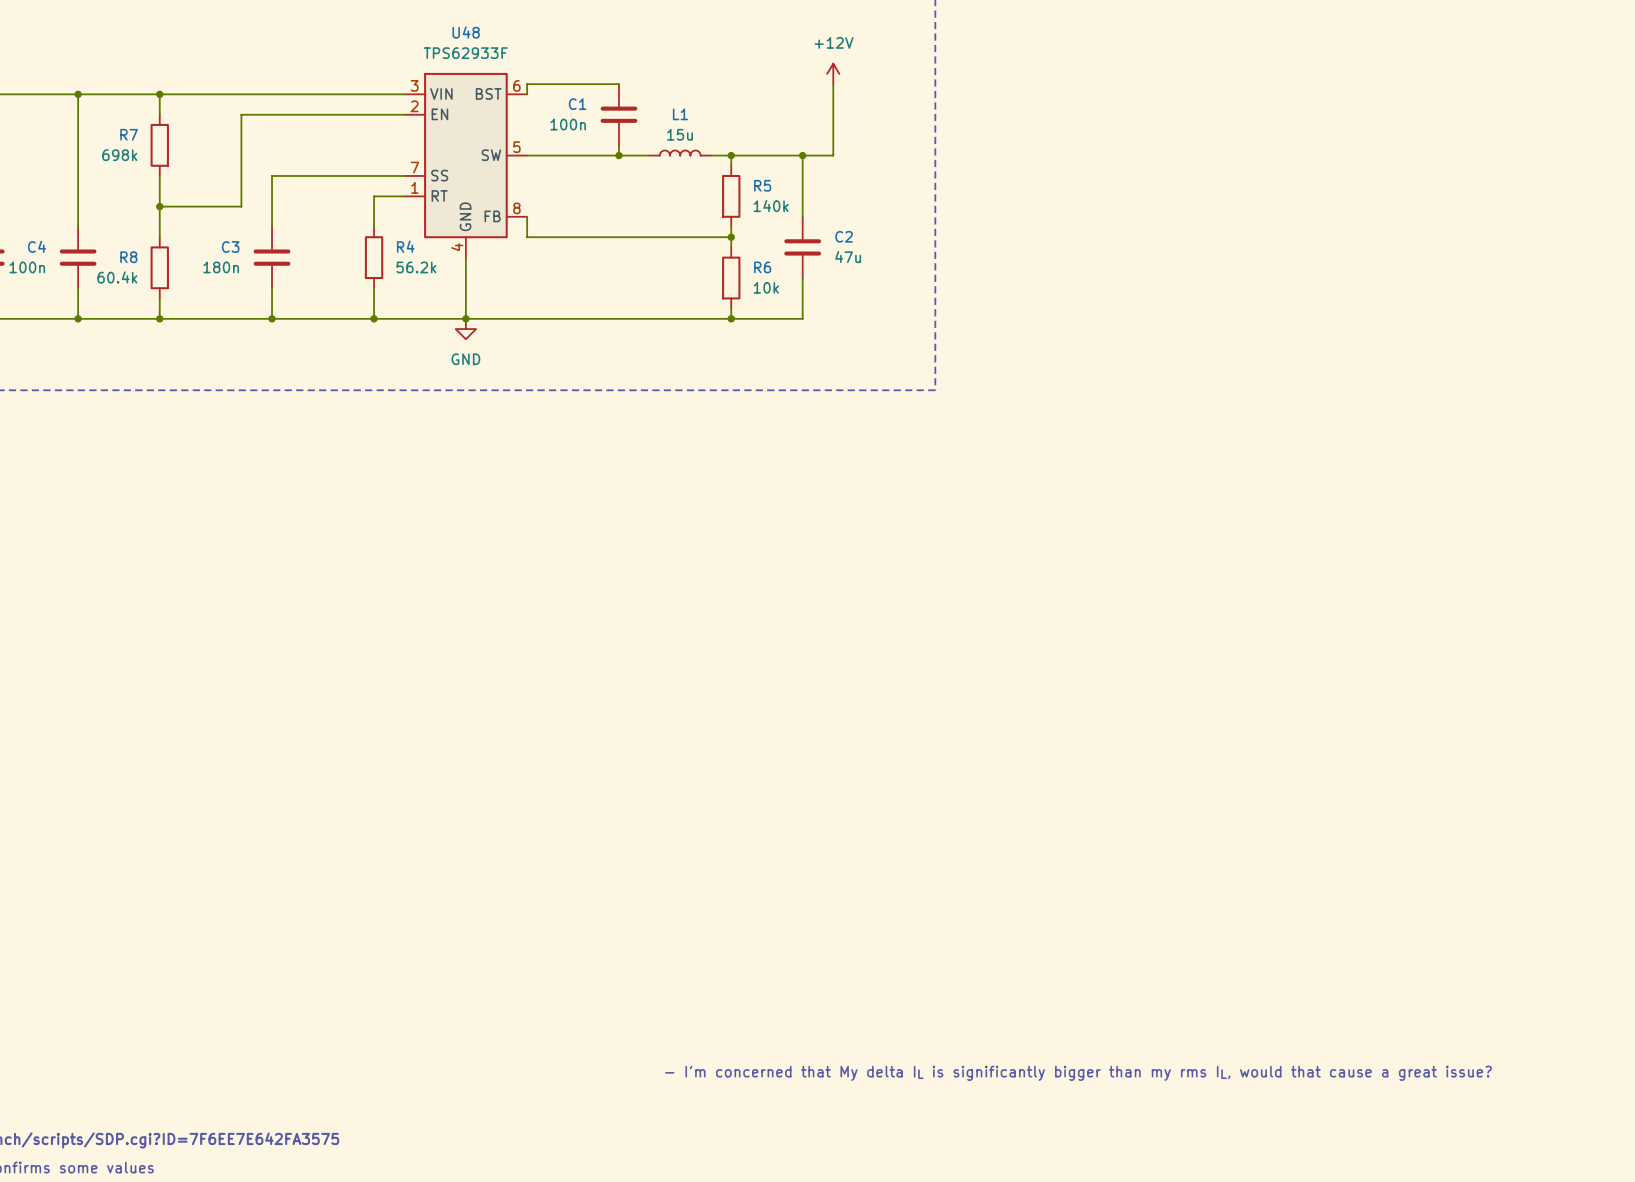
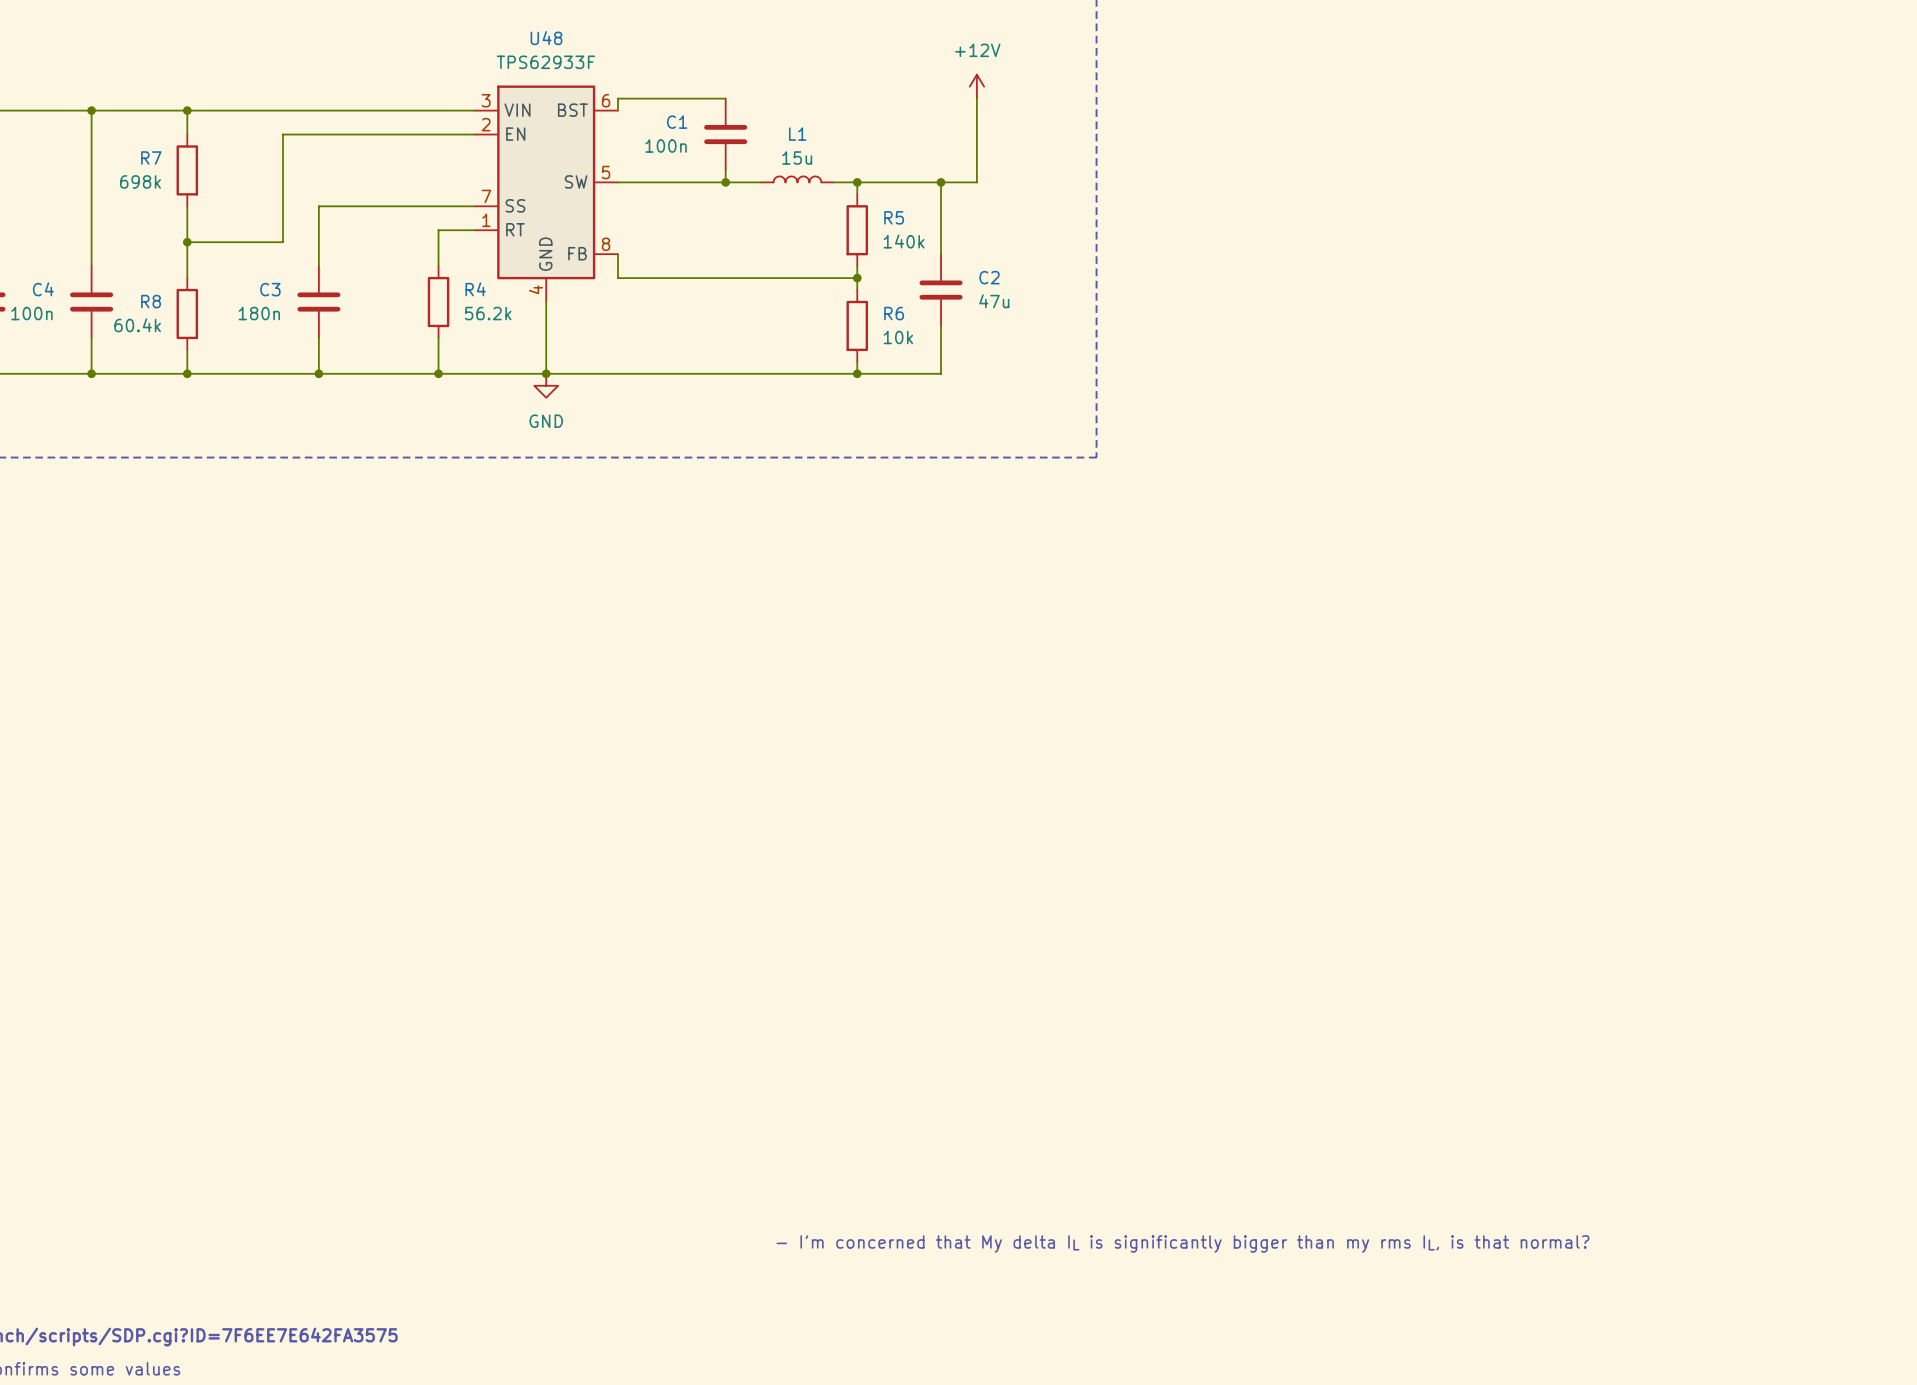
text: - I'm concerned that My delta IL is significantly bigger than my rms IL, would that cause a great issue? (1078, 1073) -> - I'm concerned that My delta IL is significantly bigger than my rms IL, is that normal? (1182, 1243)

